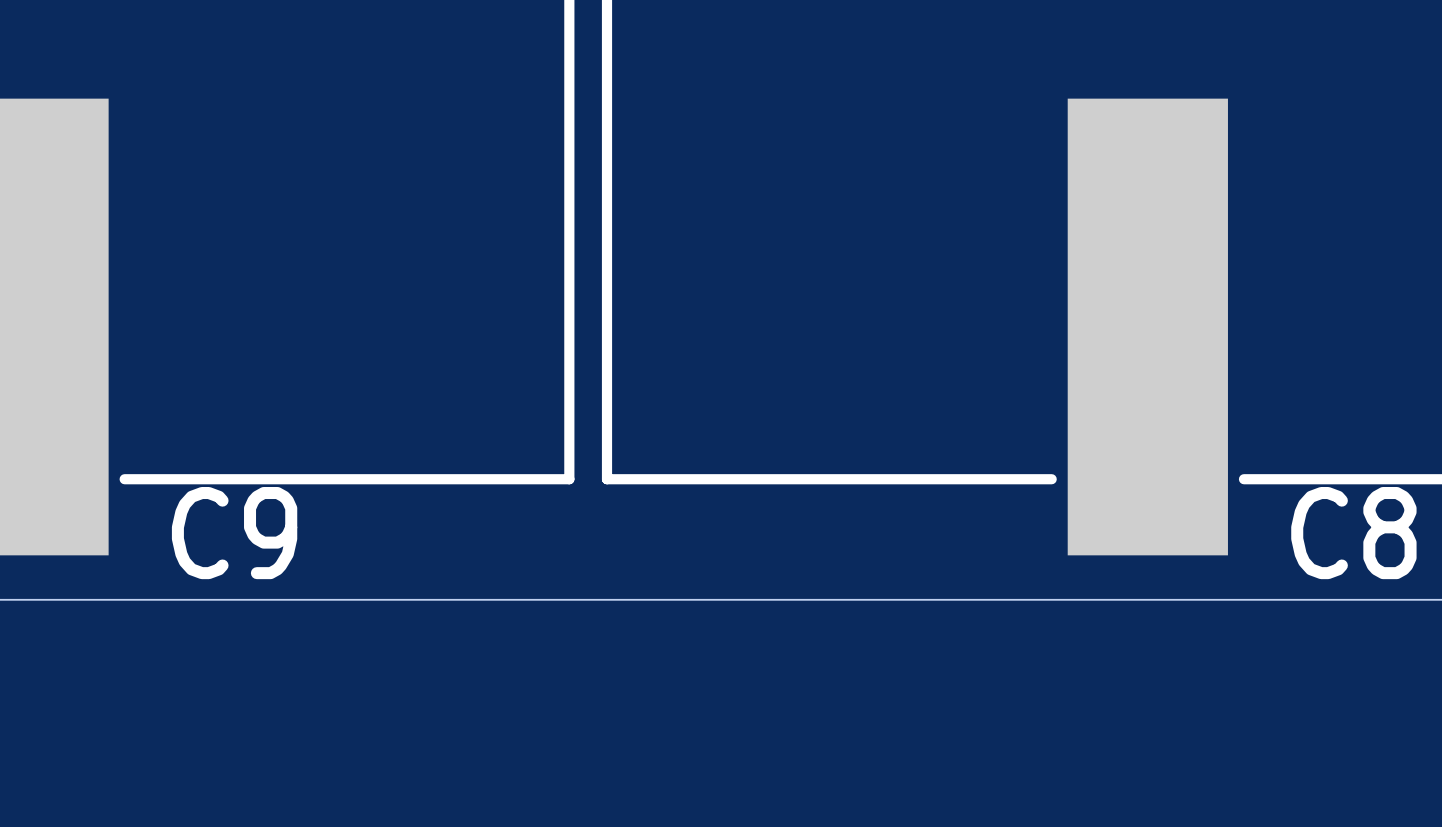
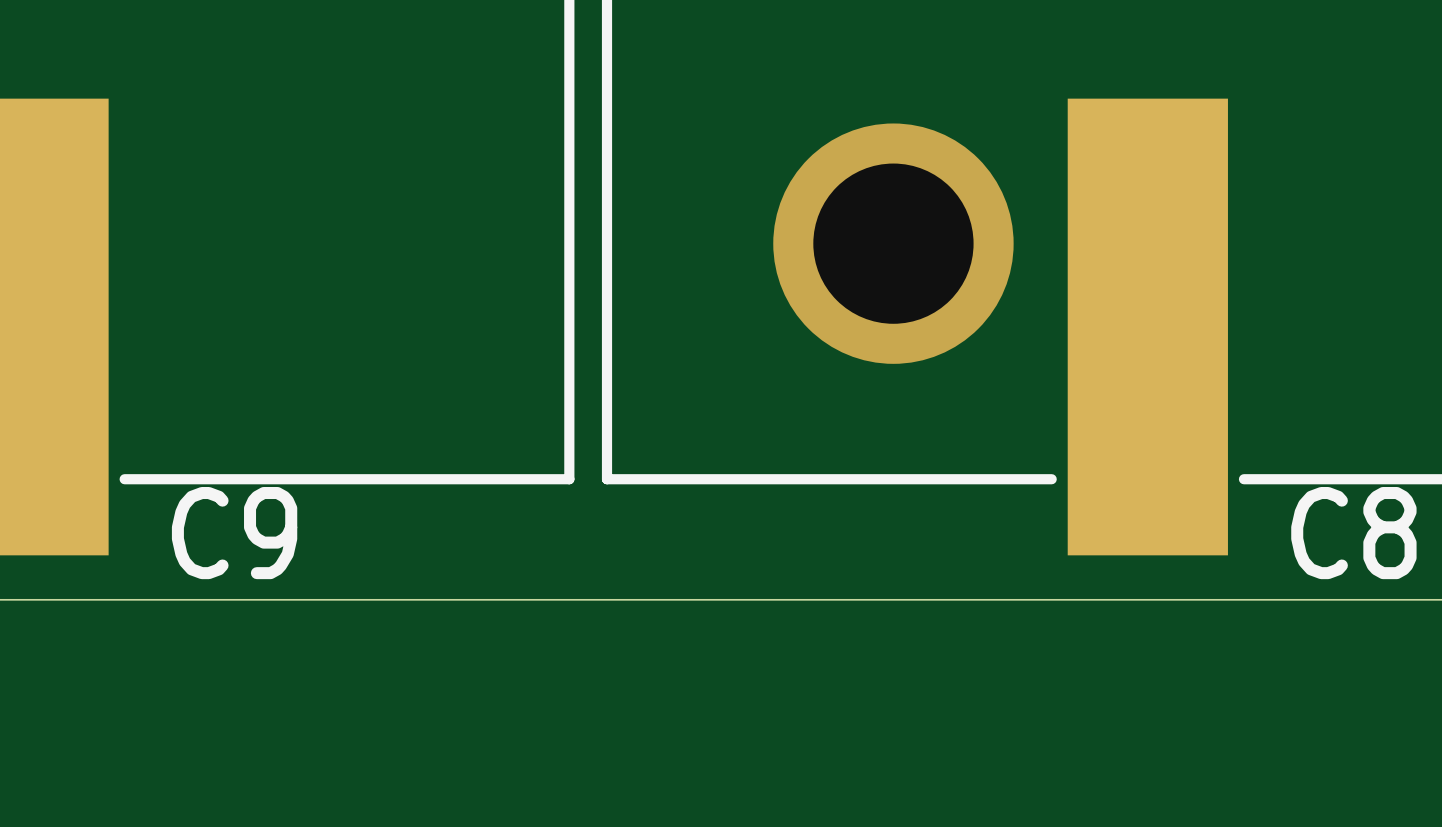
via: none -> (893, 243)

